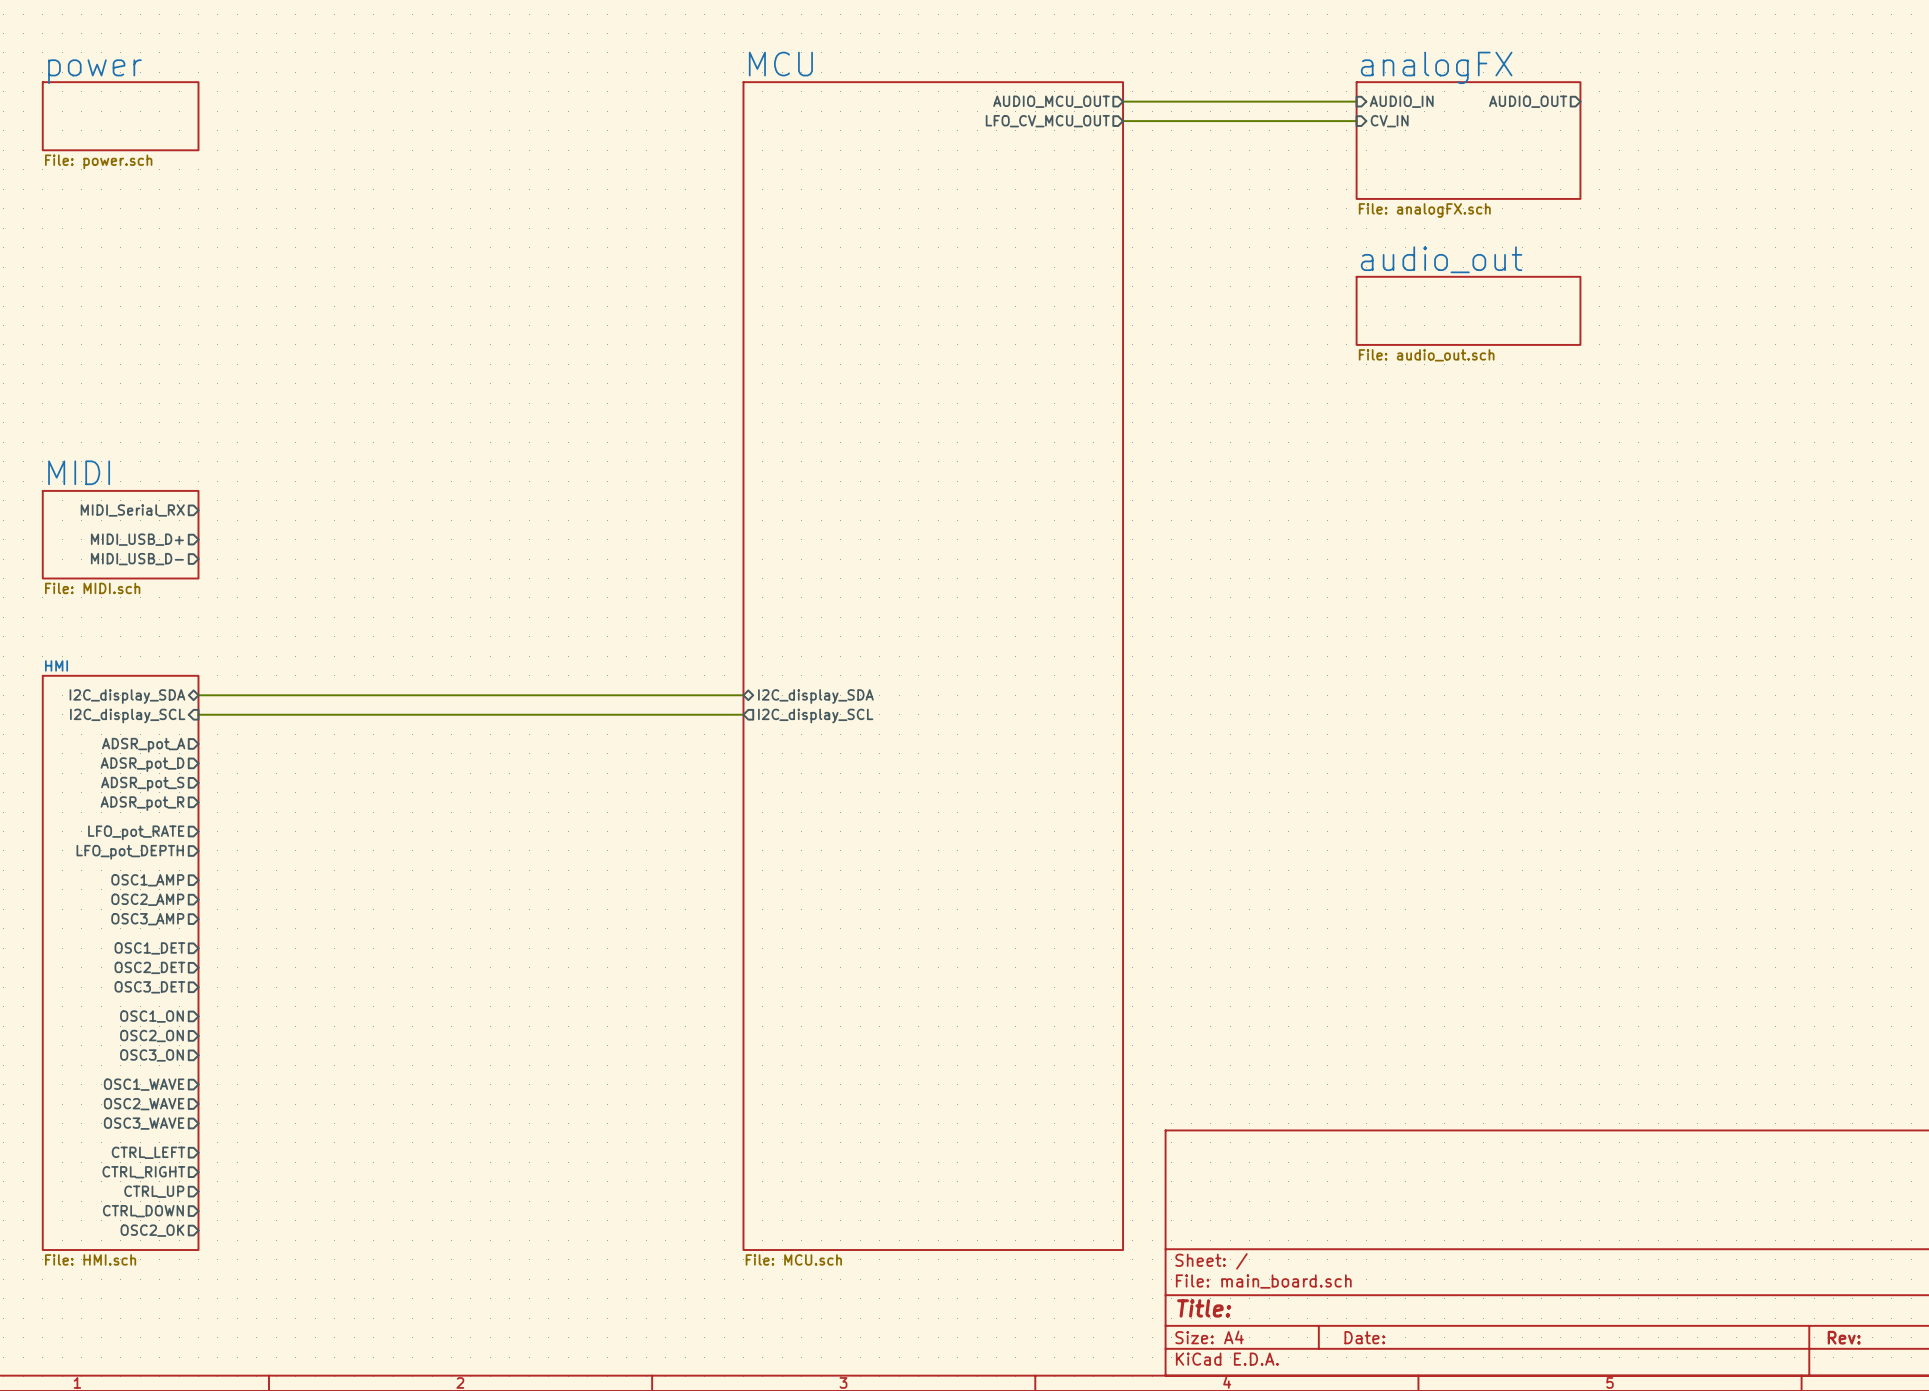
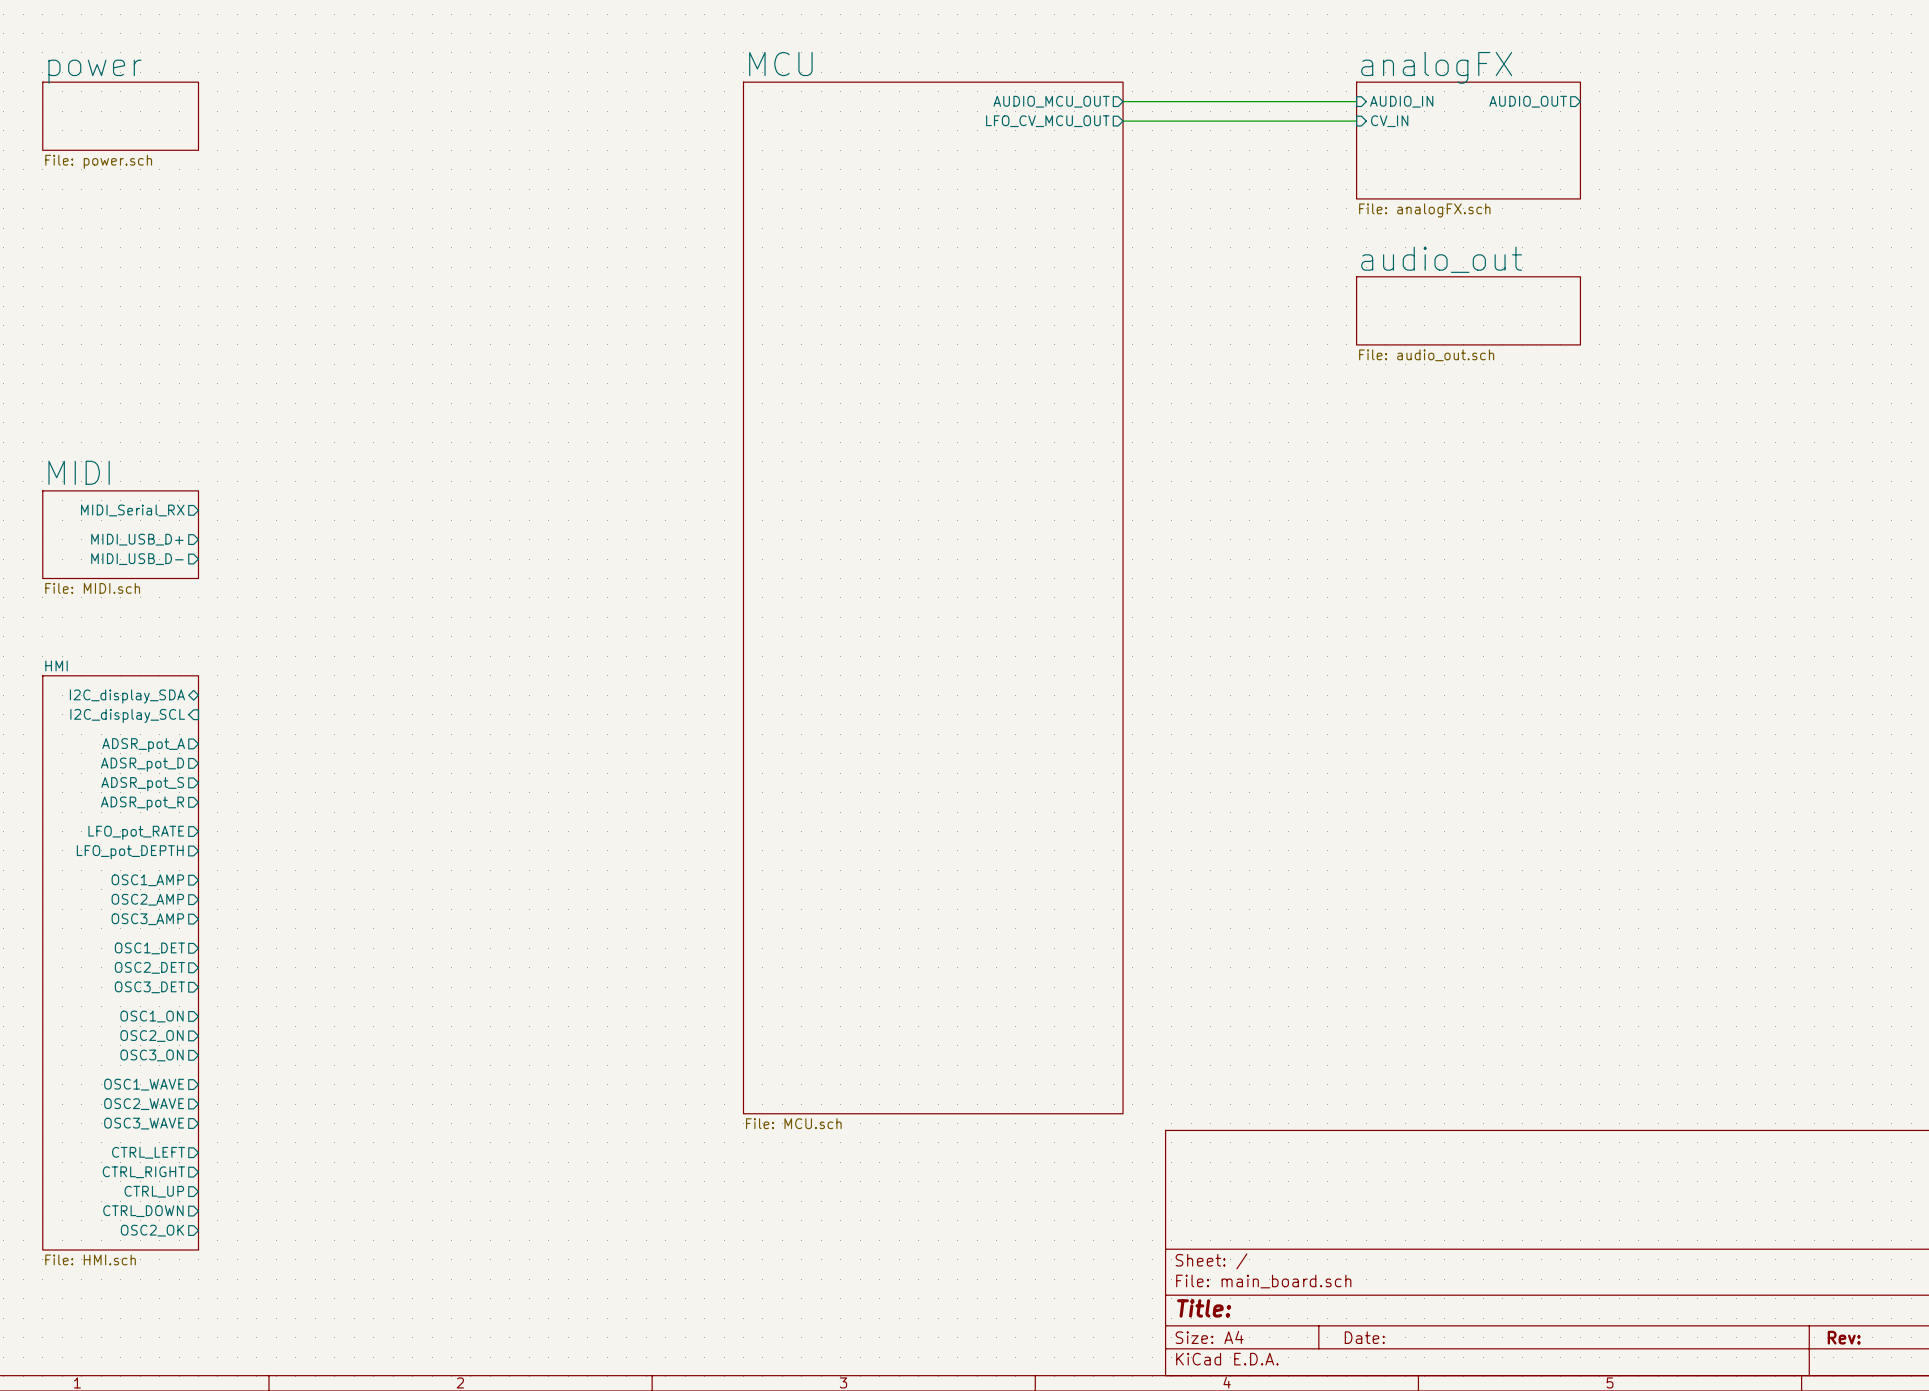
sheet MCU: none -> File: MCU.sch (933, 597)
sheet MCU: File: MCU.sch (933, 666) -> none
wire: (198, 695) (743, 695) -> none
sheet pin: I2C_display_SDA (815, 696) -> none
wire: (198, 714) (743, 714) -> none
sheet pin: I2C_display_SCL (815, 716) -> none

